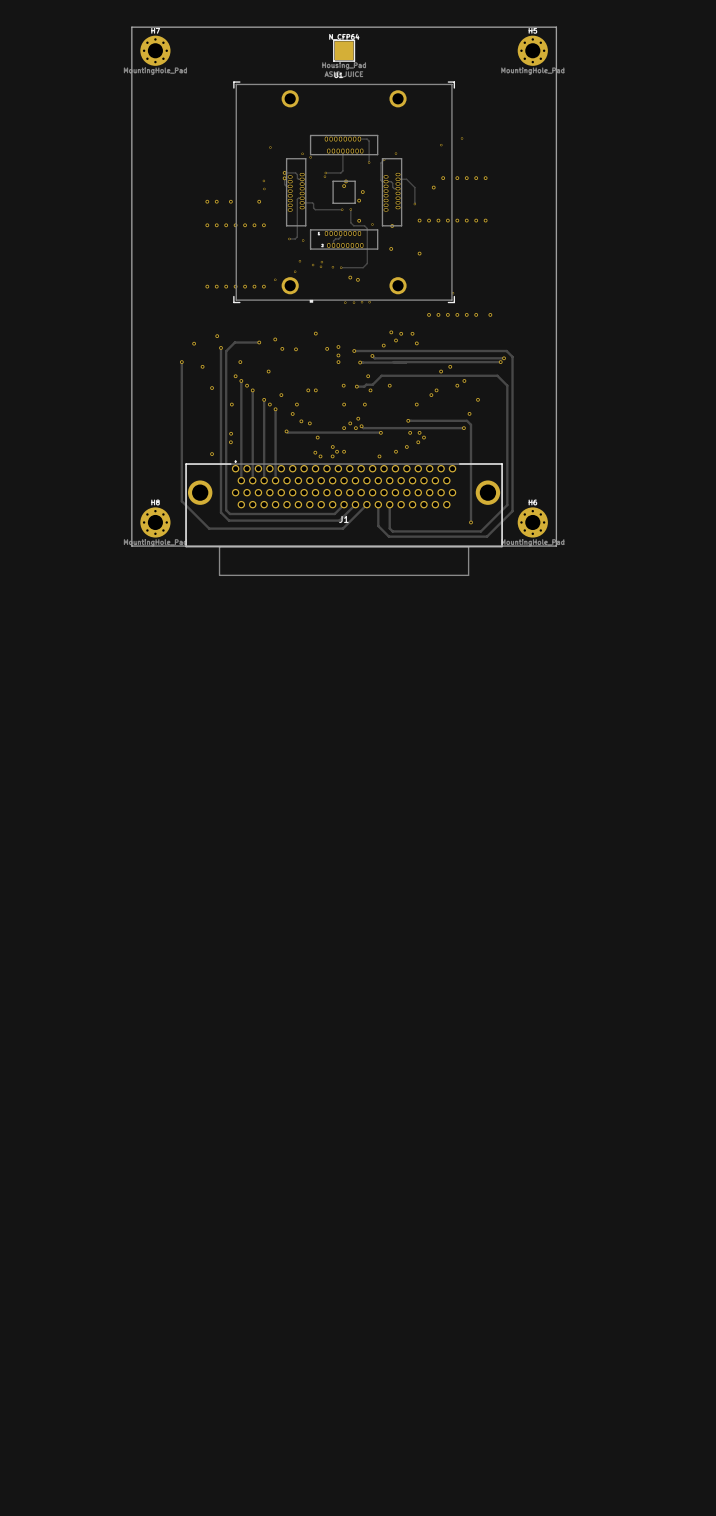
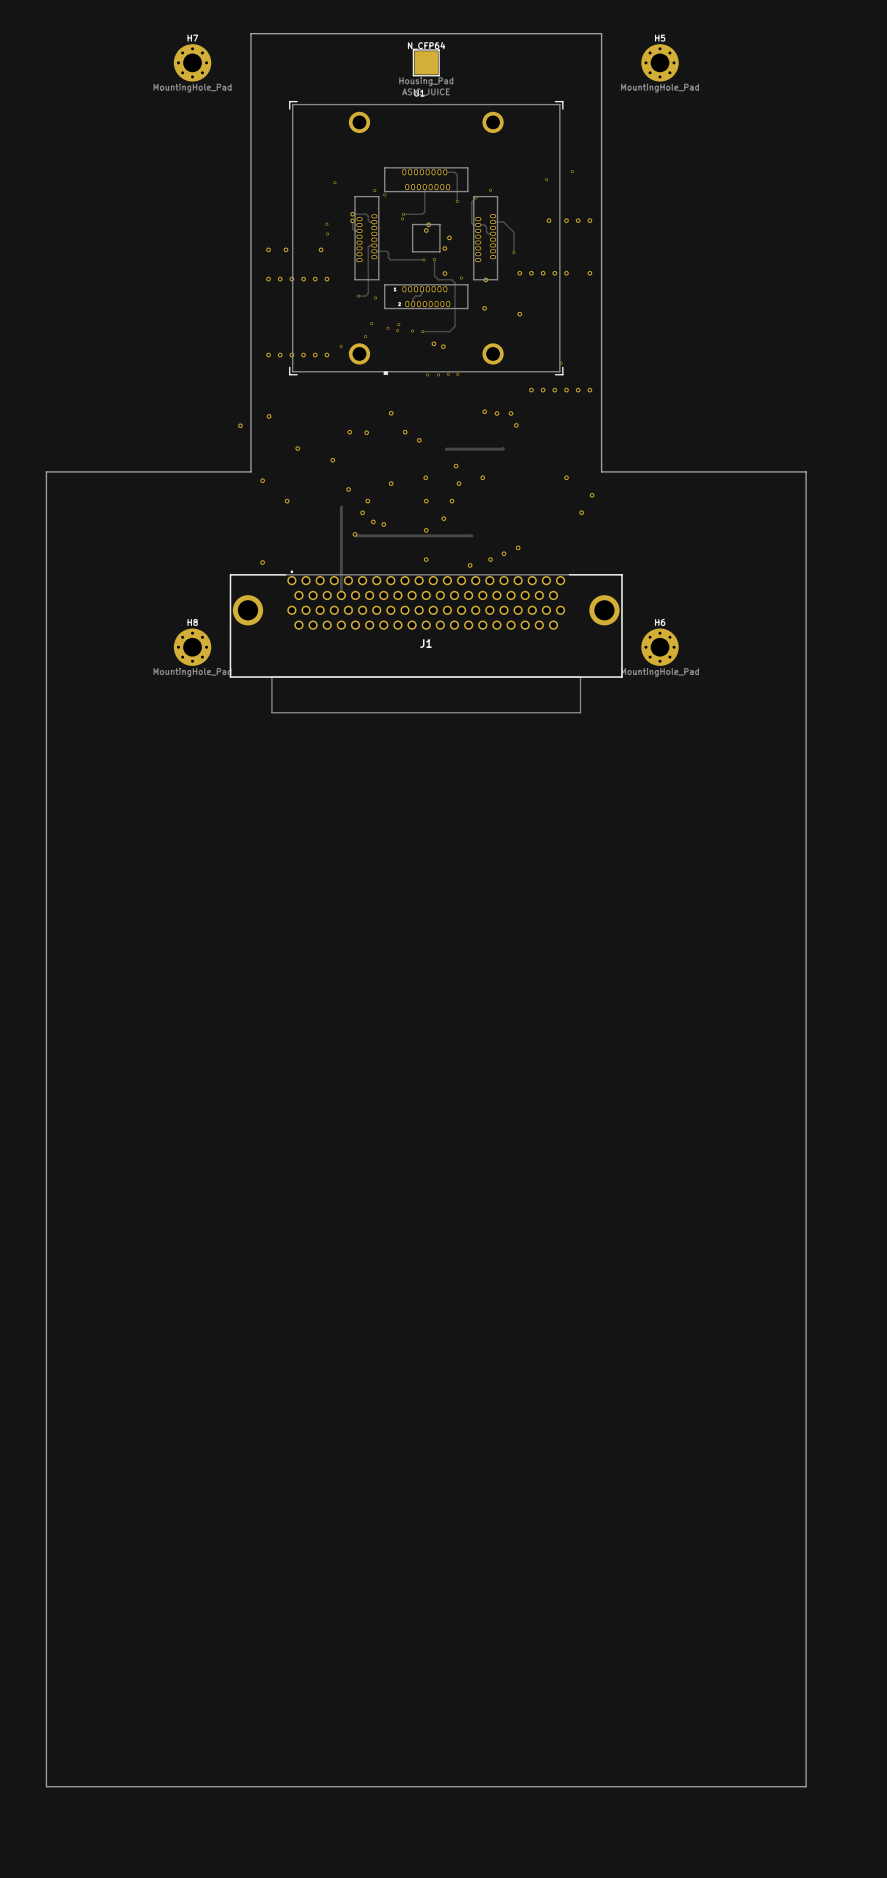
board edge: (202, 27) (131, 27) (131, 546) (556, 546) (556, 27) (485, 27) -> (250, 33) (250, 471) (46, 471) (46, 1786) (806, 1786) (806, 471) (601, 471) (601, 33)
via: (485, 178) -> none
via: (433, 187) -> none
via: (207, 201) -> none
via: (466, 220) -> none
via: (485, 220) -> none
via: (207, 225) -> none
via: (207, 286) -> none
via: (490, 314) -> none
via: (275, 339) -> none
via: (396, 340) -> none
track: (259, 342) (234, 342) (226, 351) (226, 510) (229, 513) (334, 513) (344, 504) -> none
via: (259, 342) -> none
via: (383, 345) -> none
track: (220, 347) (220, 512) (229, 520) (339, 520) (355, 504) -> none
via: (220, 347) -> none
via: (338, 347) -> none
track: (354, 351) (506, 351) (512, 356) (512, 511) (487, 536) (388, 536) (378, 526) (378, 504) -> none
via: (354, 351) -> none
track: (372, 355) (374, 358) (504, 358) -> none
via: (372, 355) -> none
via: (504, 358) -> none
track: (181, 362) (181, 501) (209, 528) (342, 528) (366, 504) -> none
via: (181, 362) -> none
via: (338, 362) -> none
via: (360, 362) -> none
track: (393, 362) (500, 362) -> none
via: (500, 362) -> none
via: (202, 366) -> none
via: (450, 366) -> none
via: (441, 371) -> none
via: (235, 376) -> none
track: (241, 380) (241, 480) -> none
via: (241, 380) -> none
via: (464, 380) -> none
via: (247, 385) -> none
track: (356, 386) (372, 384) (381, 375) (497, 375) (507, 385) (507, 505) (480, 531) (392, 531) (389, 528) (389, 504) -> none
via: (356, 386) -> none
track: (252, 390) (252, 480) -> none
via: (252, 390) -> none
via: (308, 390) -> none
via: (436, 390) -> none
via: (431, 395) -> none
track: (264, 399) (264, 480) -> none
via: (264, 399) -> none
via: (269, 404) -> none
via: (416, 404) -> none
via: (275, 409) -> none
track: (408, 420) (466, 420) (471, 424) (471, 522) -> none
via: (408, 420) -> none
via: (350, 423) -> none
track: (361, 426) (363, 428) (463, 428) -> none
via: (361, 426) -> none
via: (355, 428) -> none
via: (463, 428) -> none
via: (380, 432) -> none
via: (410, 432) -> none
via: (419, 432) -> none
via: (231, 433) -> none
via: (317, 437) -> none
via: (423, 437) -> none
via: (230, 442) -> none
via: (332, 447) -> none
via: (337, 451) -> none
via: (315, 452) -> none
via: (320, 456) -> none
via: (332, 456) -> none
via: (471, 522) -> none

